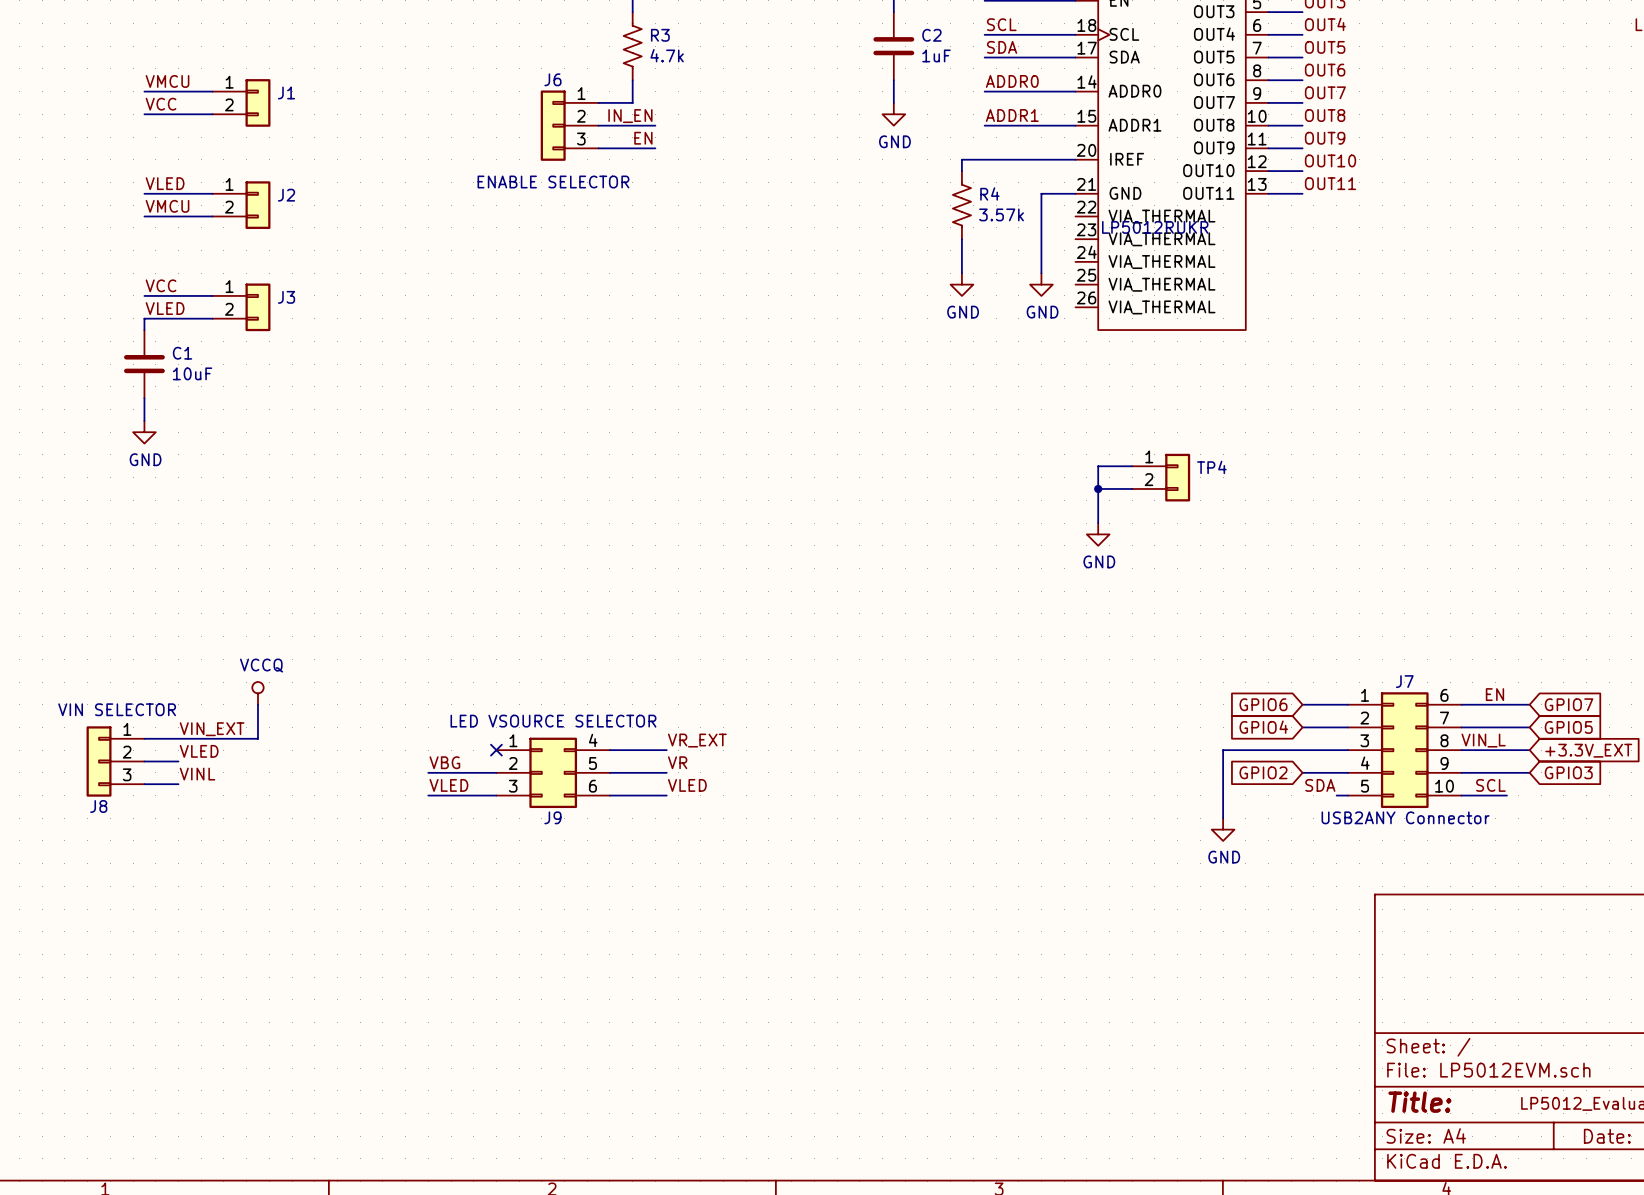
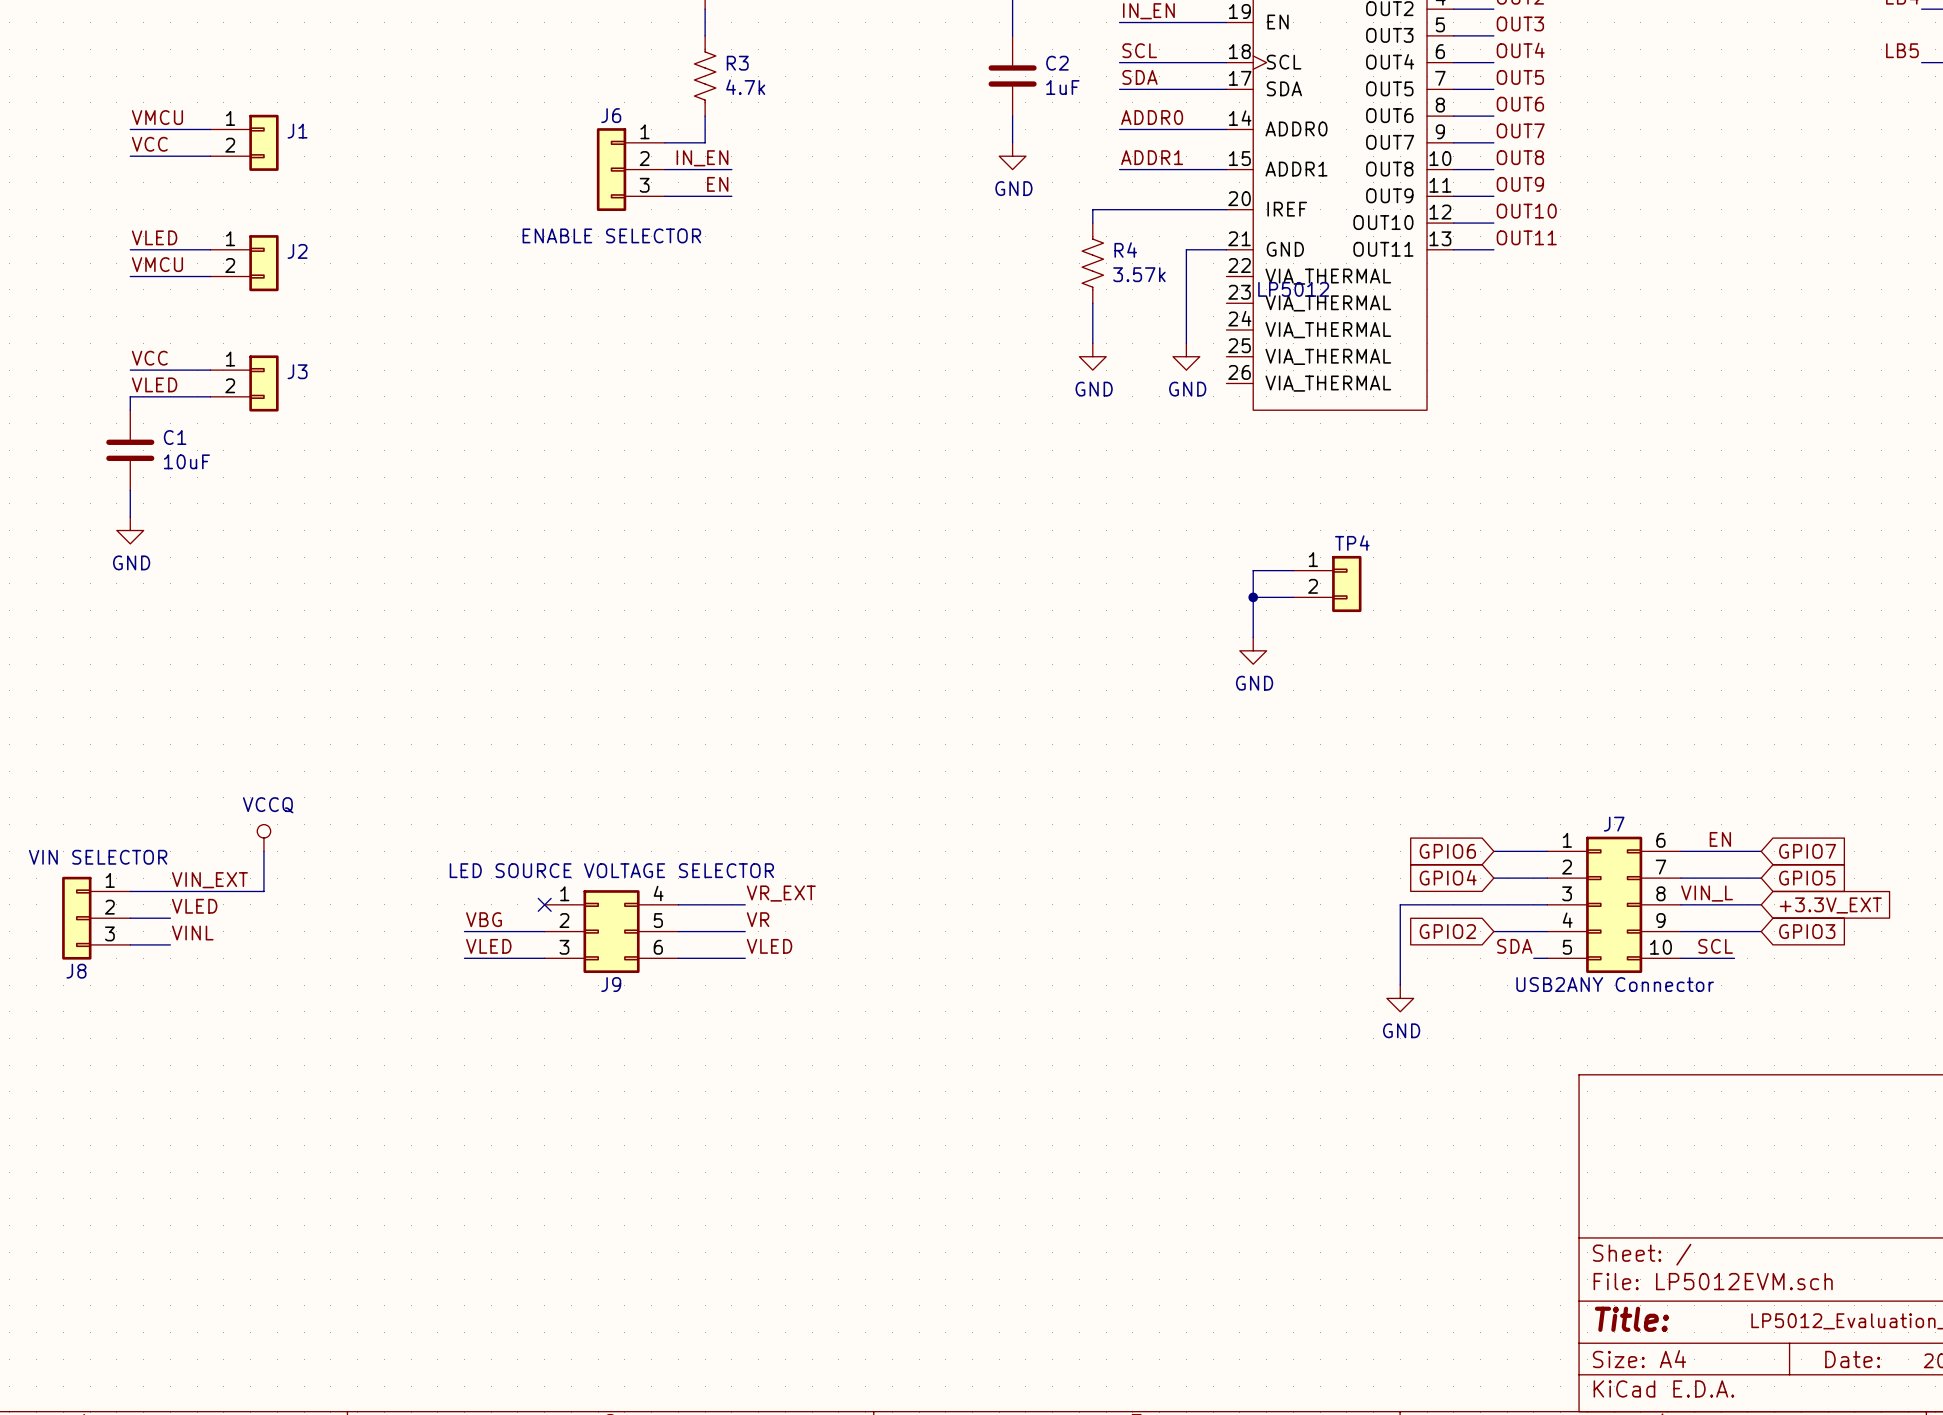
part value: LP5012RUKR (1155, 227) -> LP5012 (1293, 289)
TP4 name position: TP4 (1211, 467) -> TP4 (1352, 543)
J9 value: LED VSOURCE SELECTOR (553, 721) -> LED SOURCE VOLTAGE SELECTOR (611, 870)

